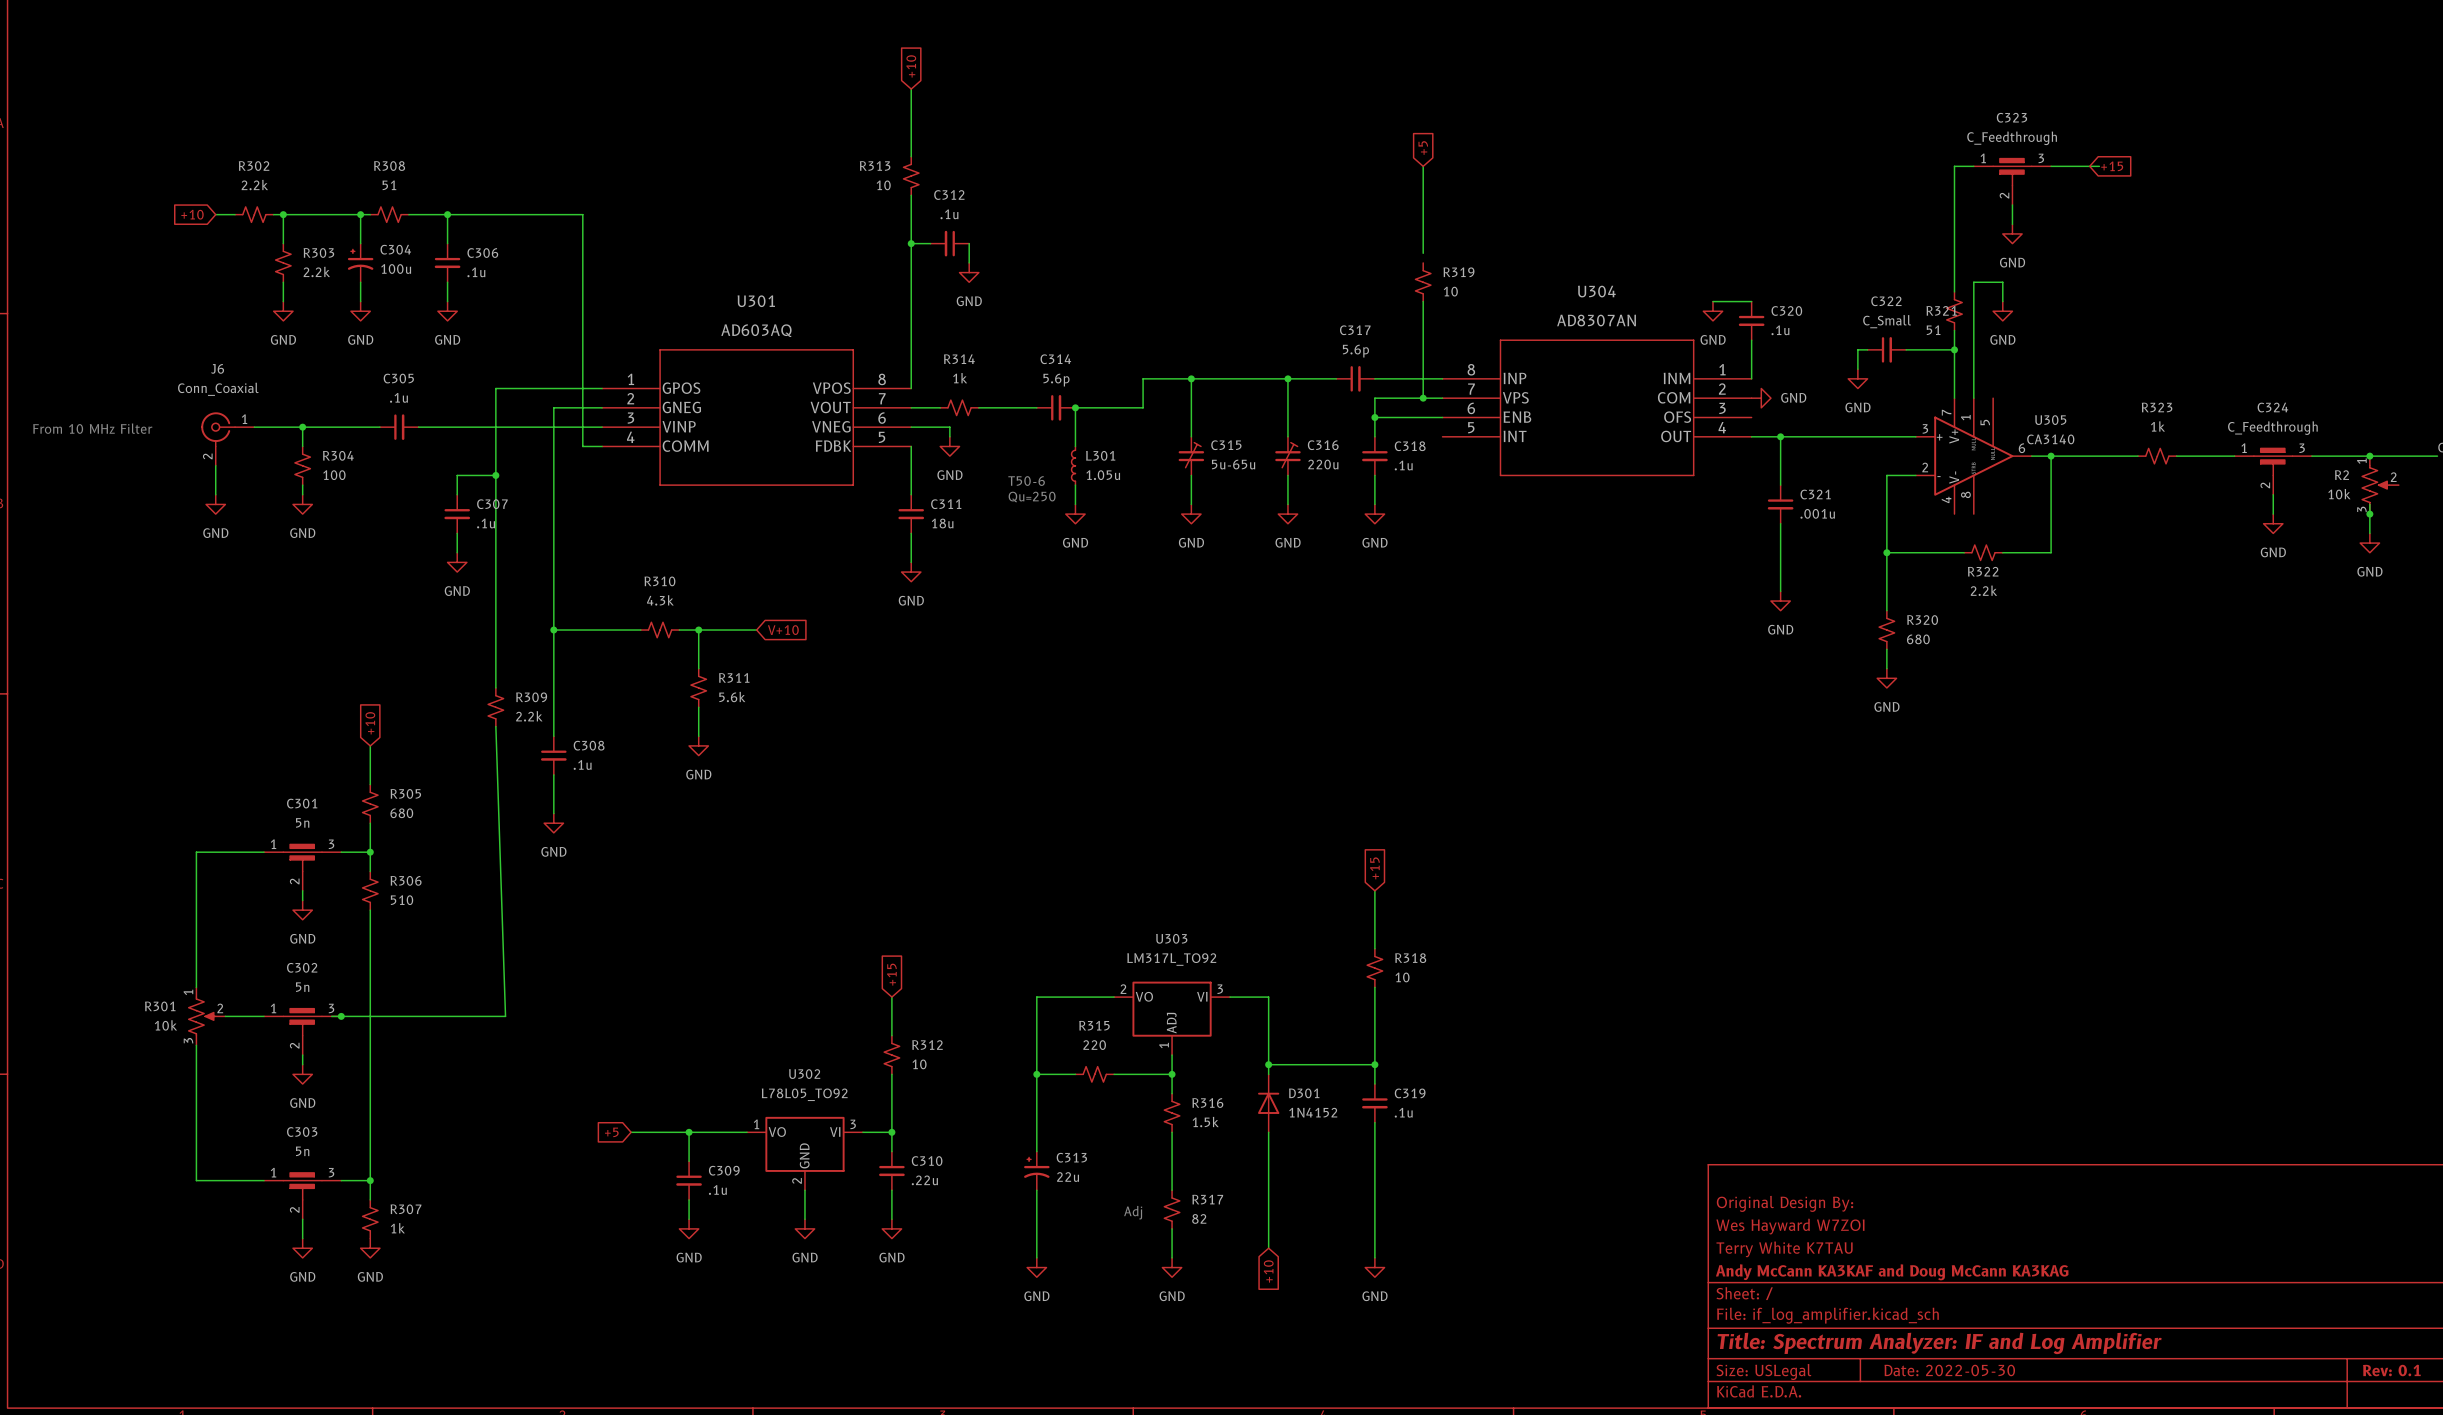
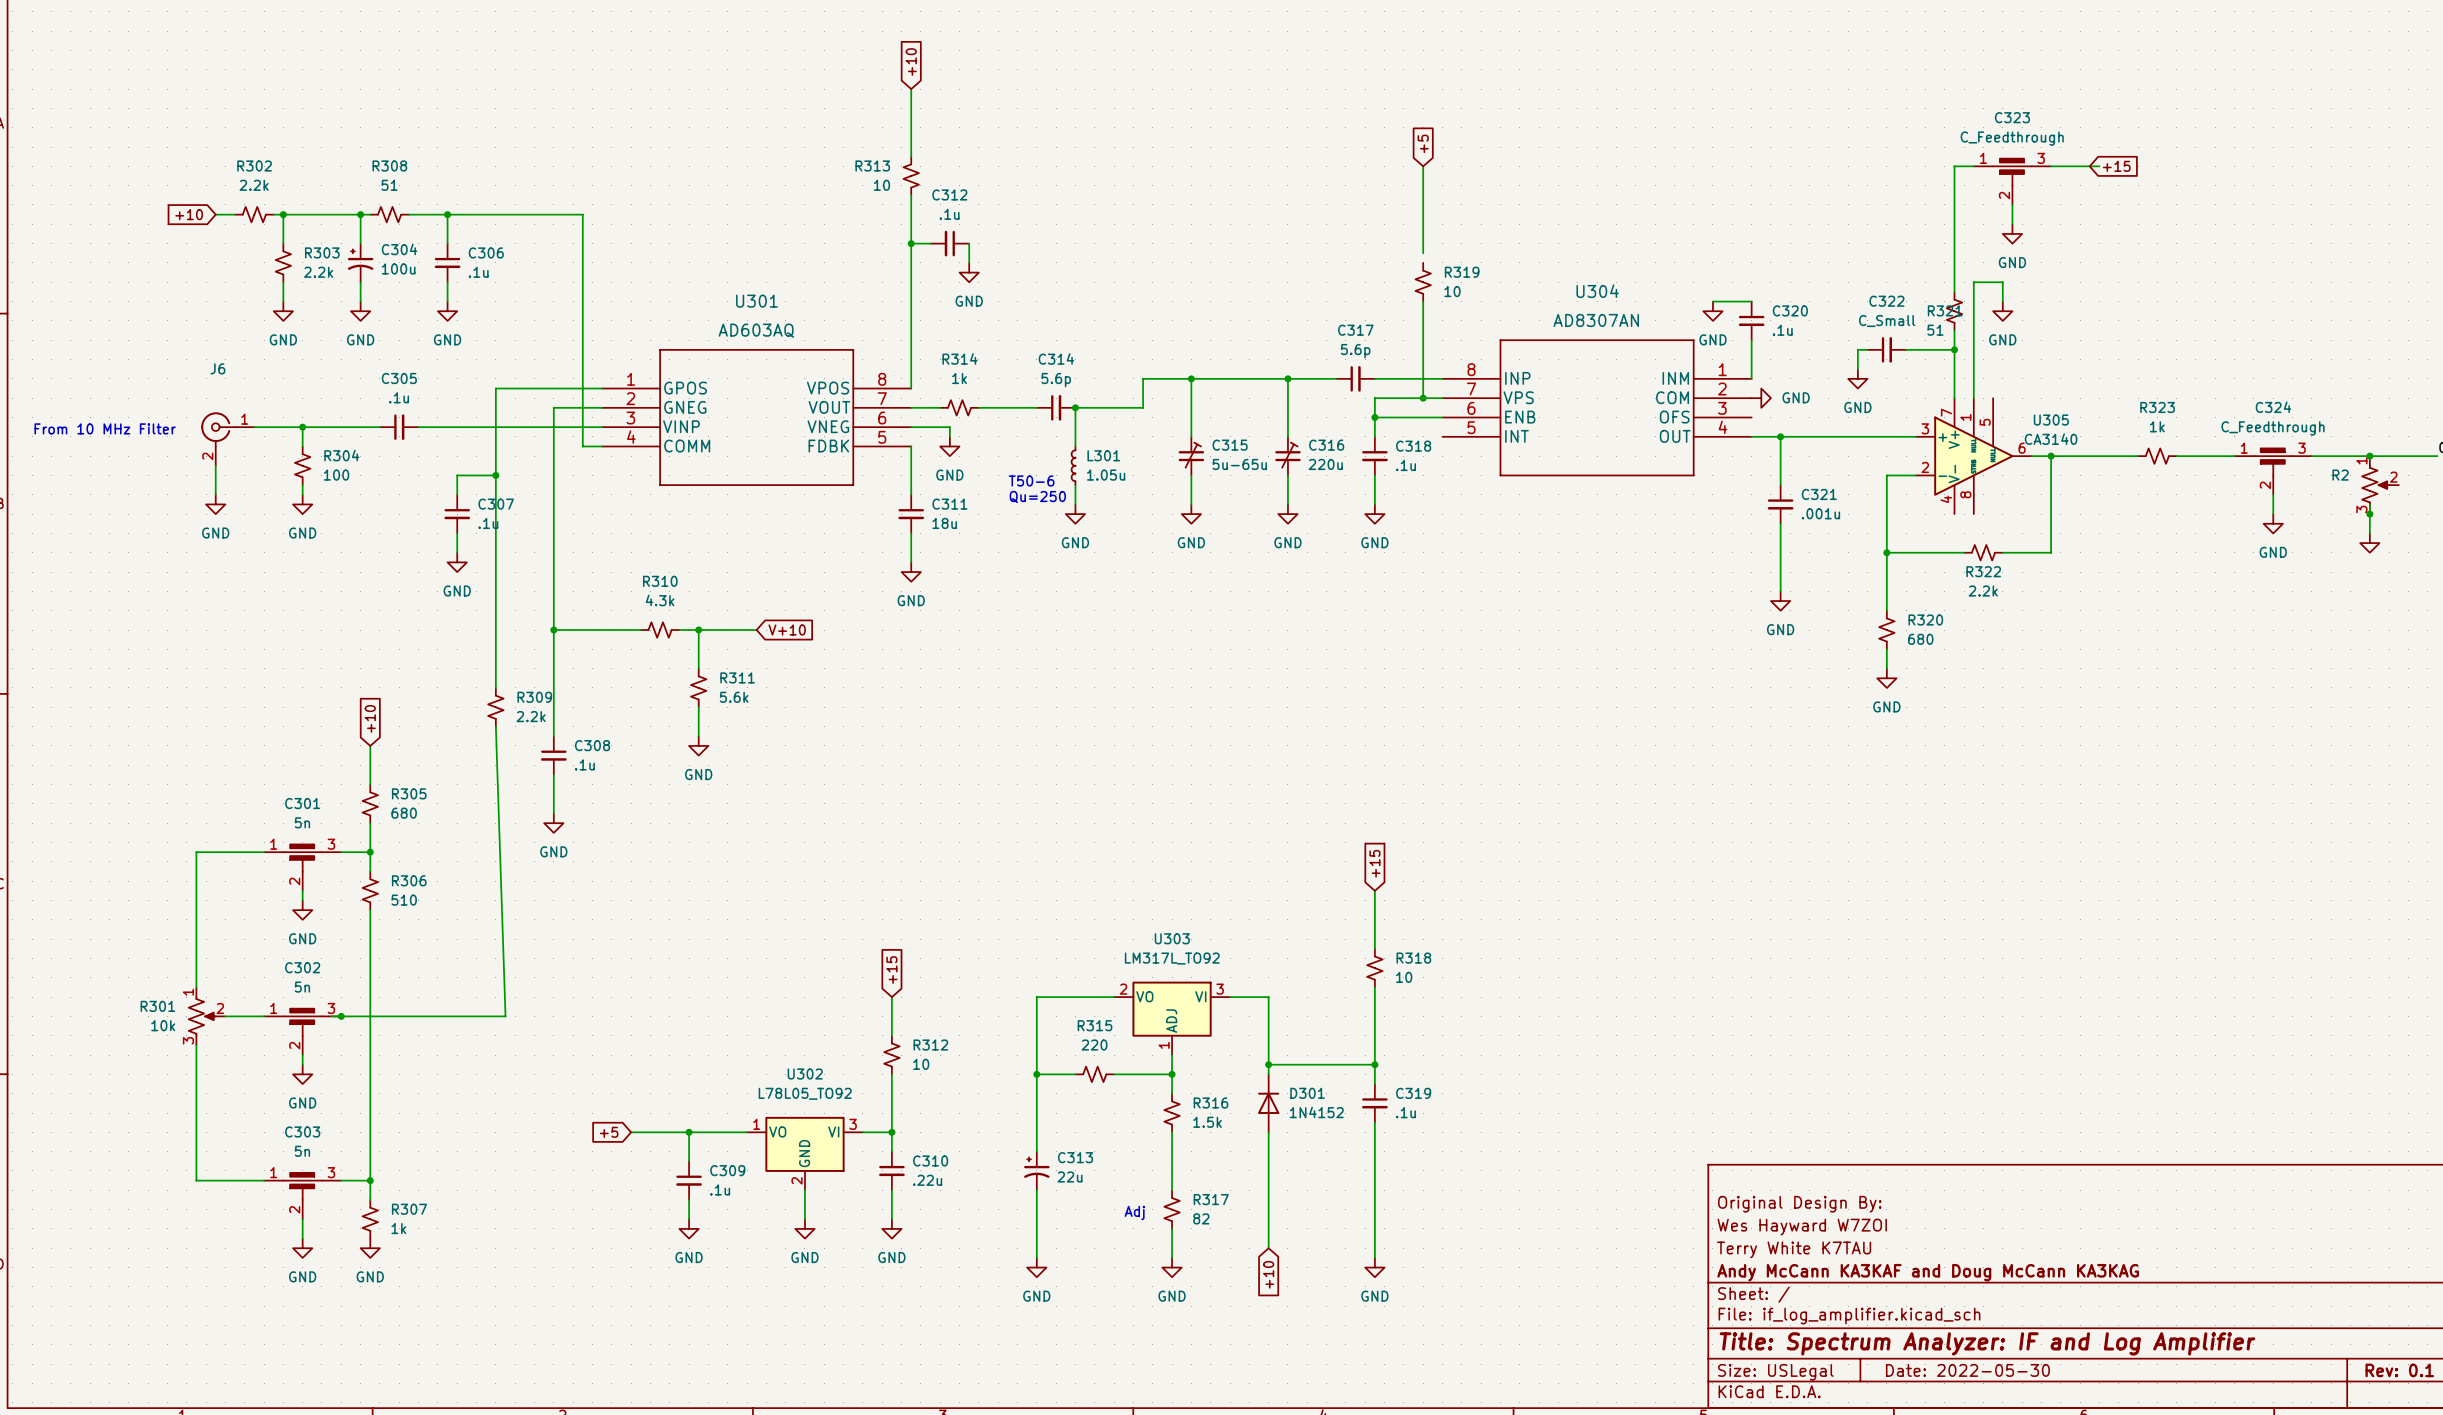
J6 value: Conn_Coaxial (218, 389) -> none
R2 value: 10k (2339, 494) -> none
power symbol text: GND (2369, 571) -> none

